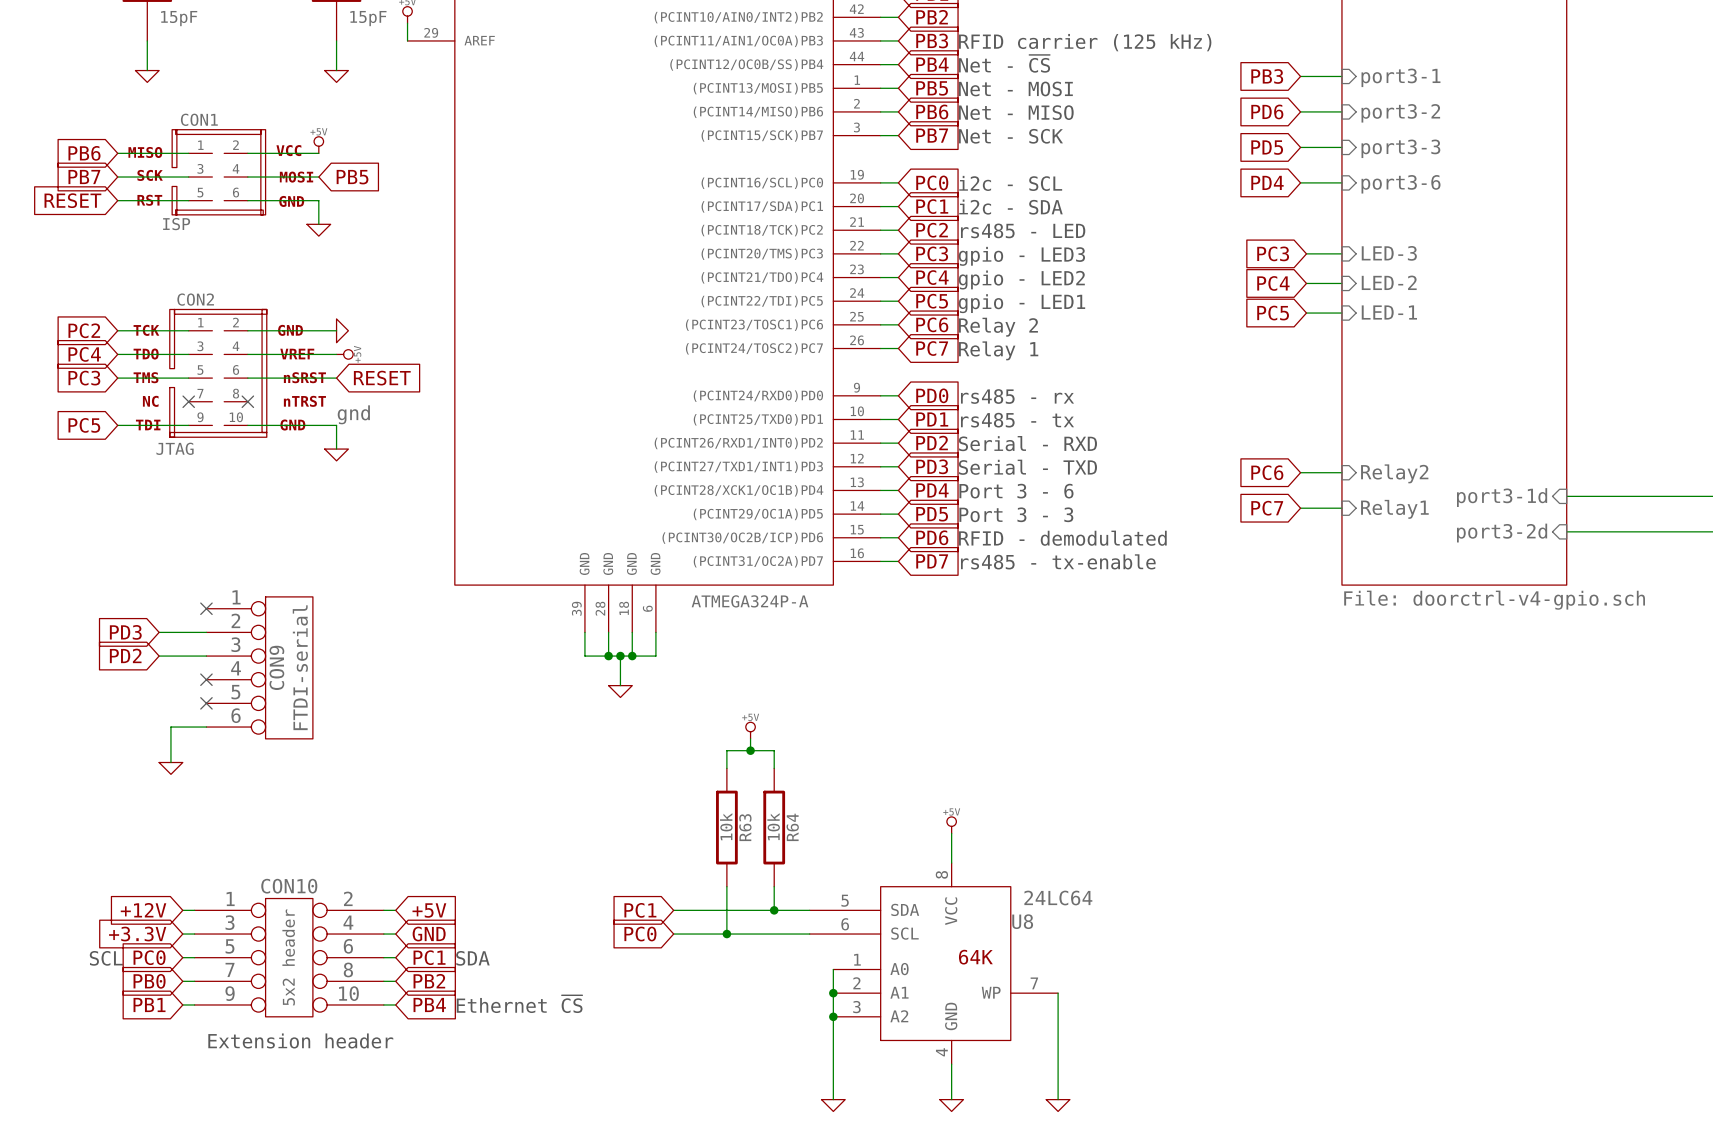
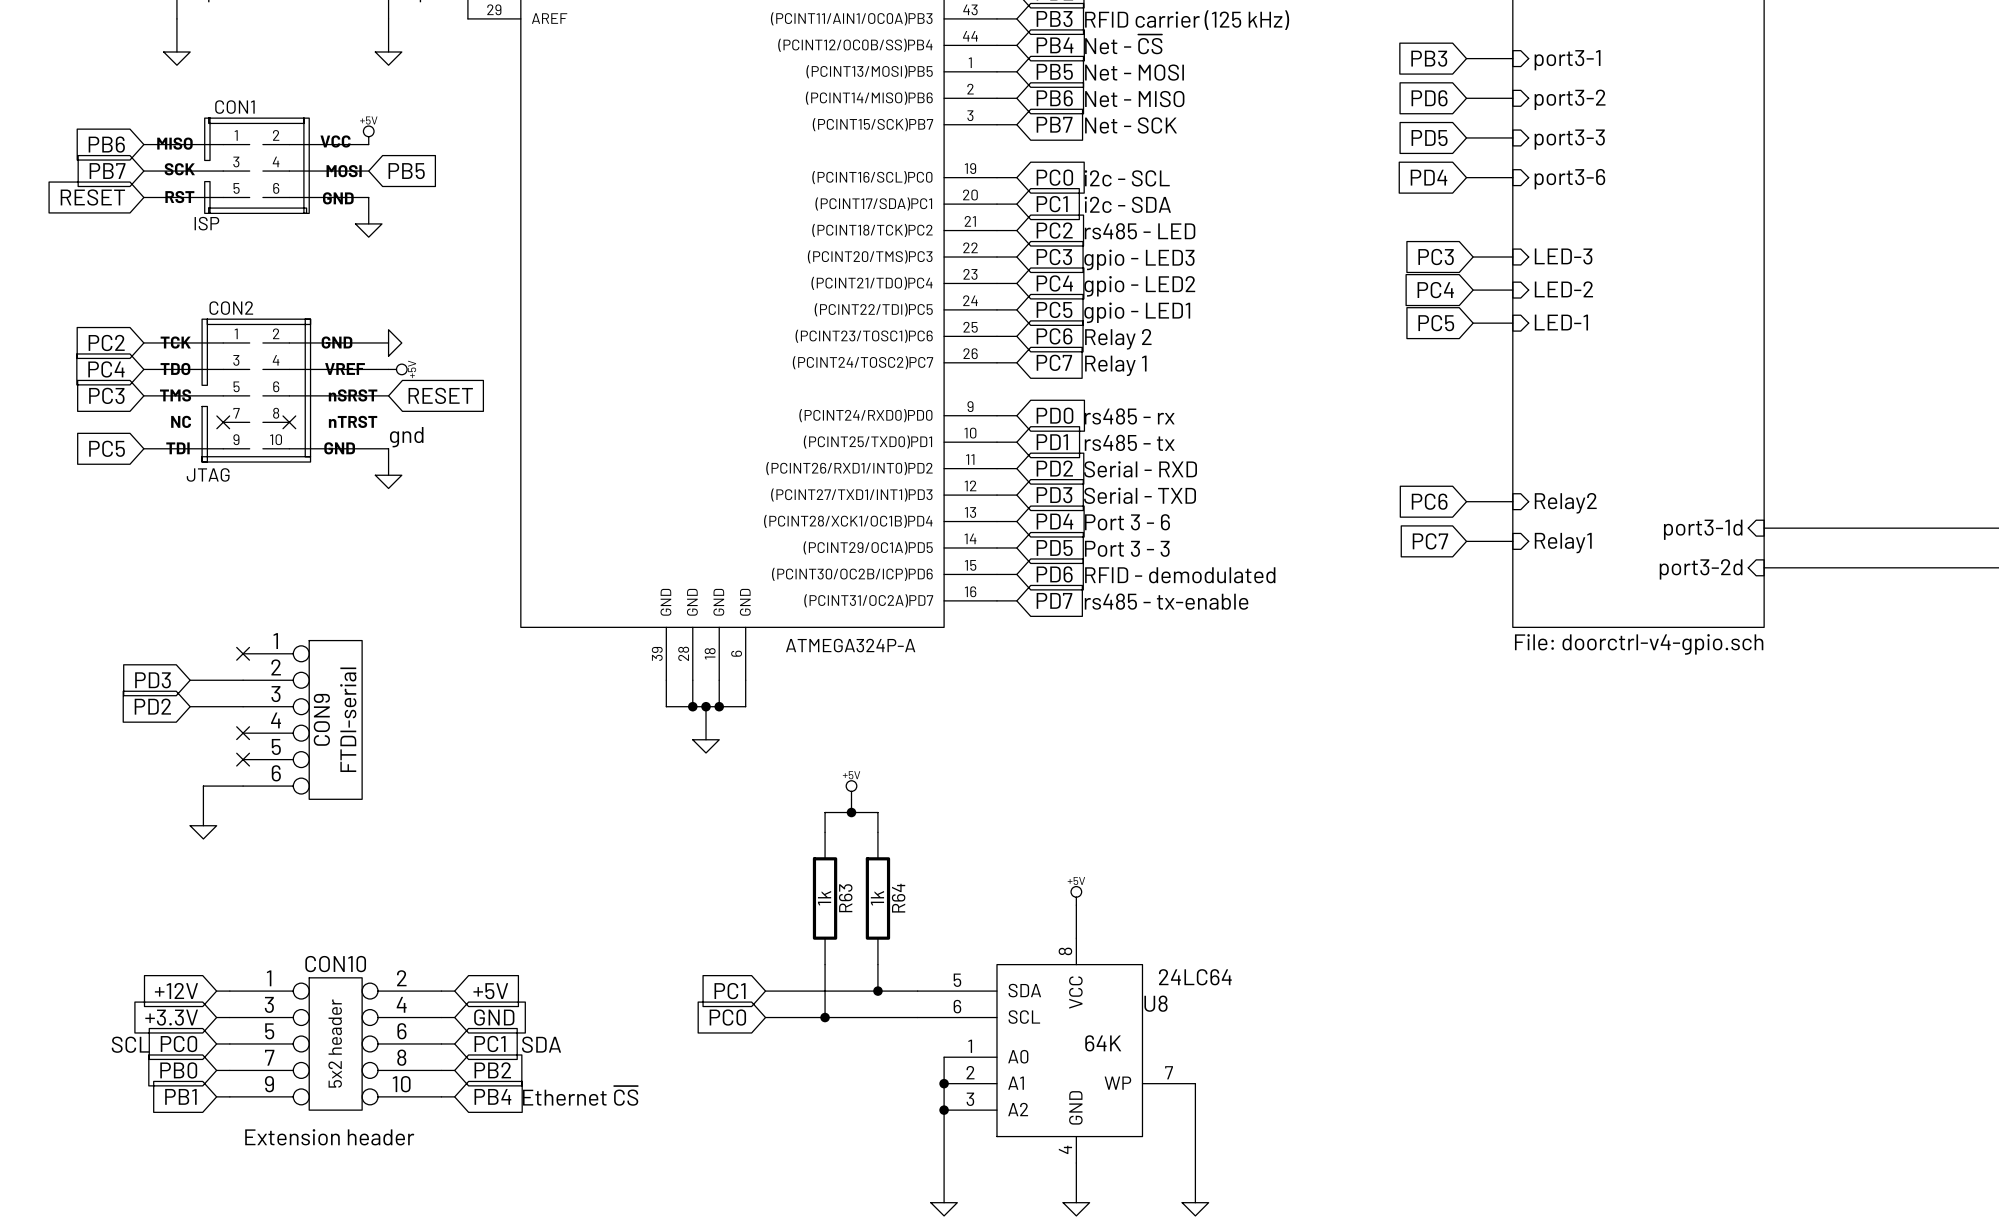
R63 value: 10k (726, 826) -> 1k (824, 898)
R64 value: 10k (773, 826) -> 1k (877, 898)

